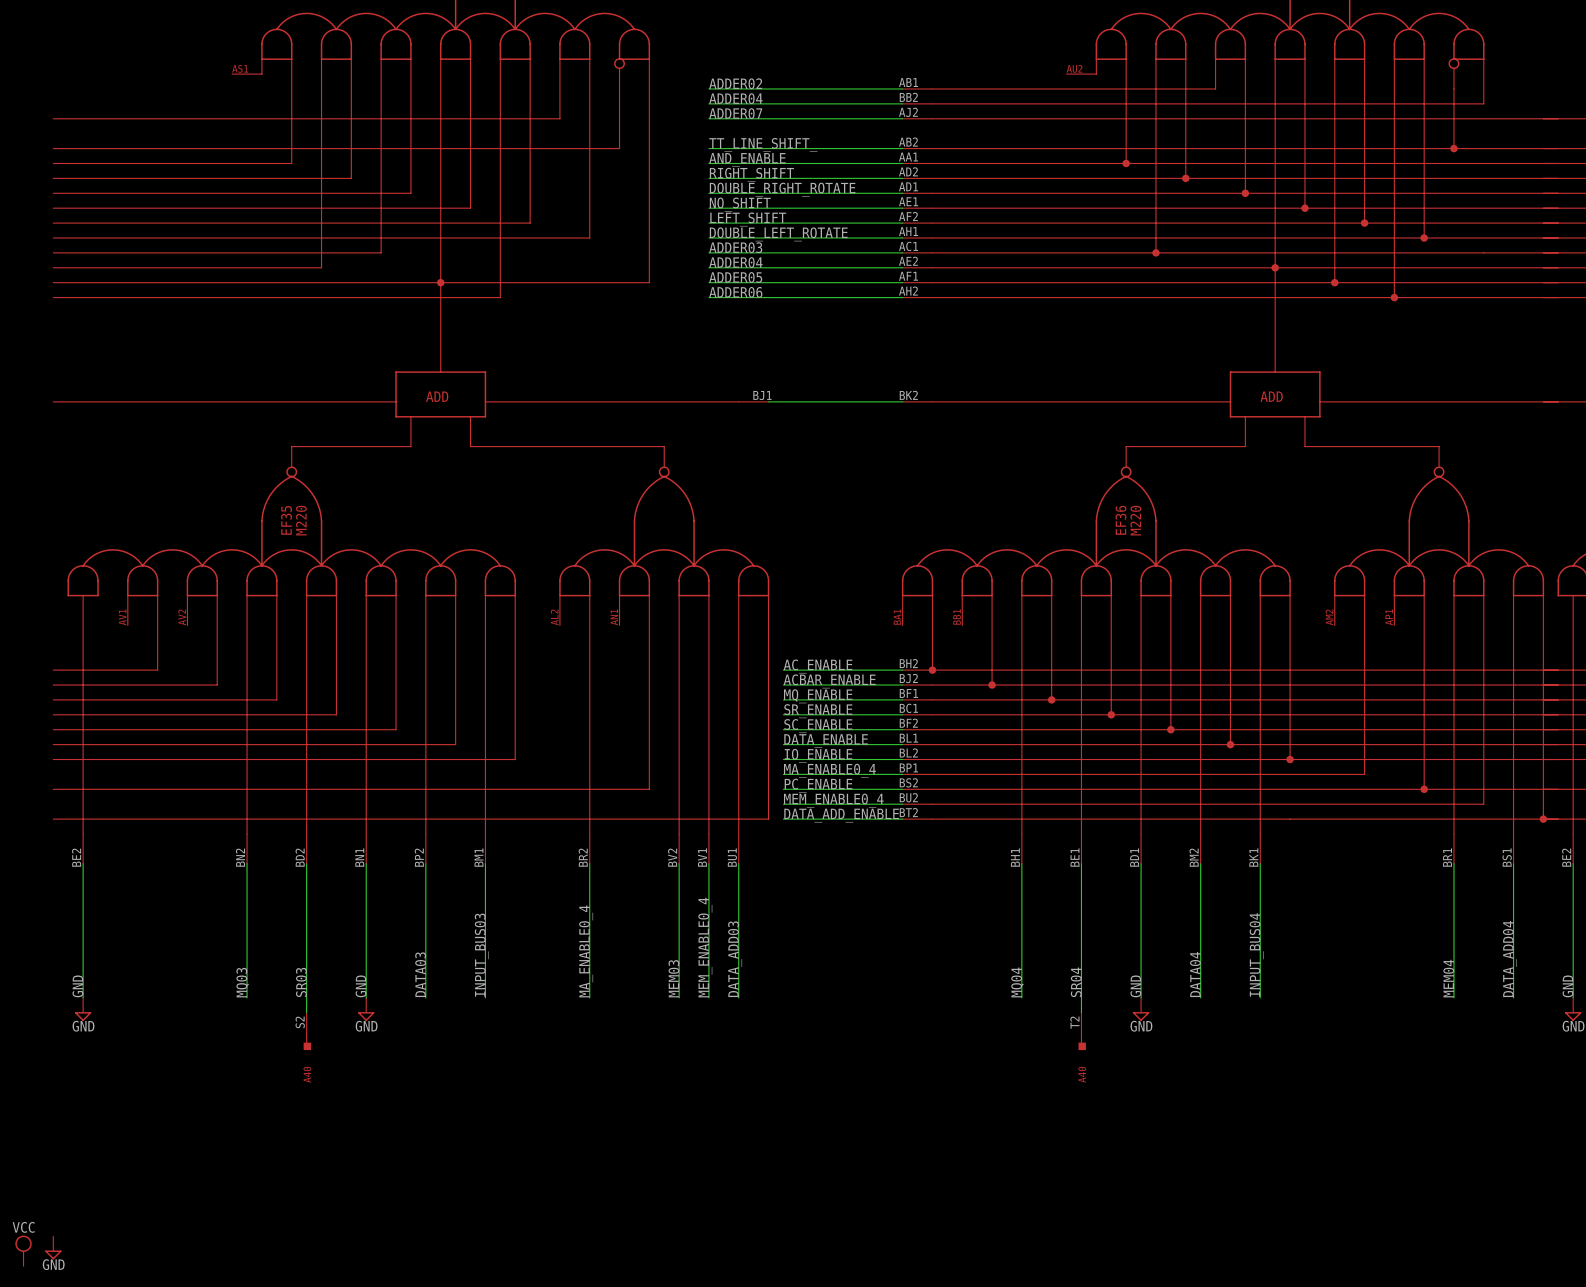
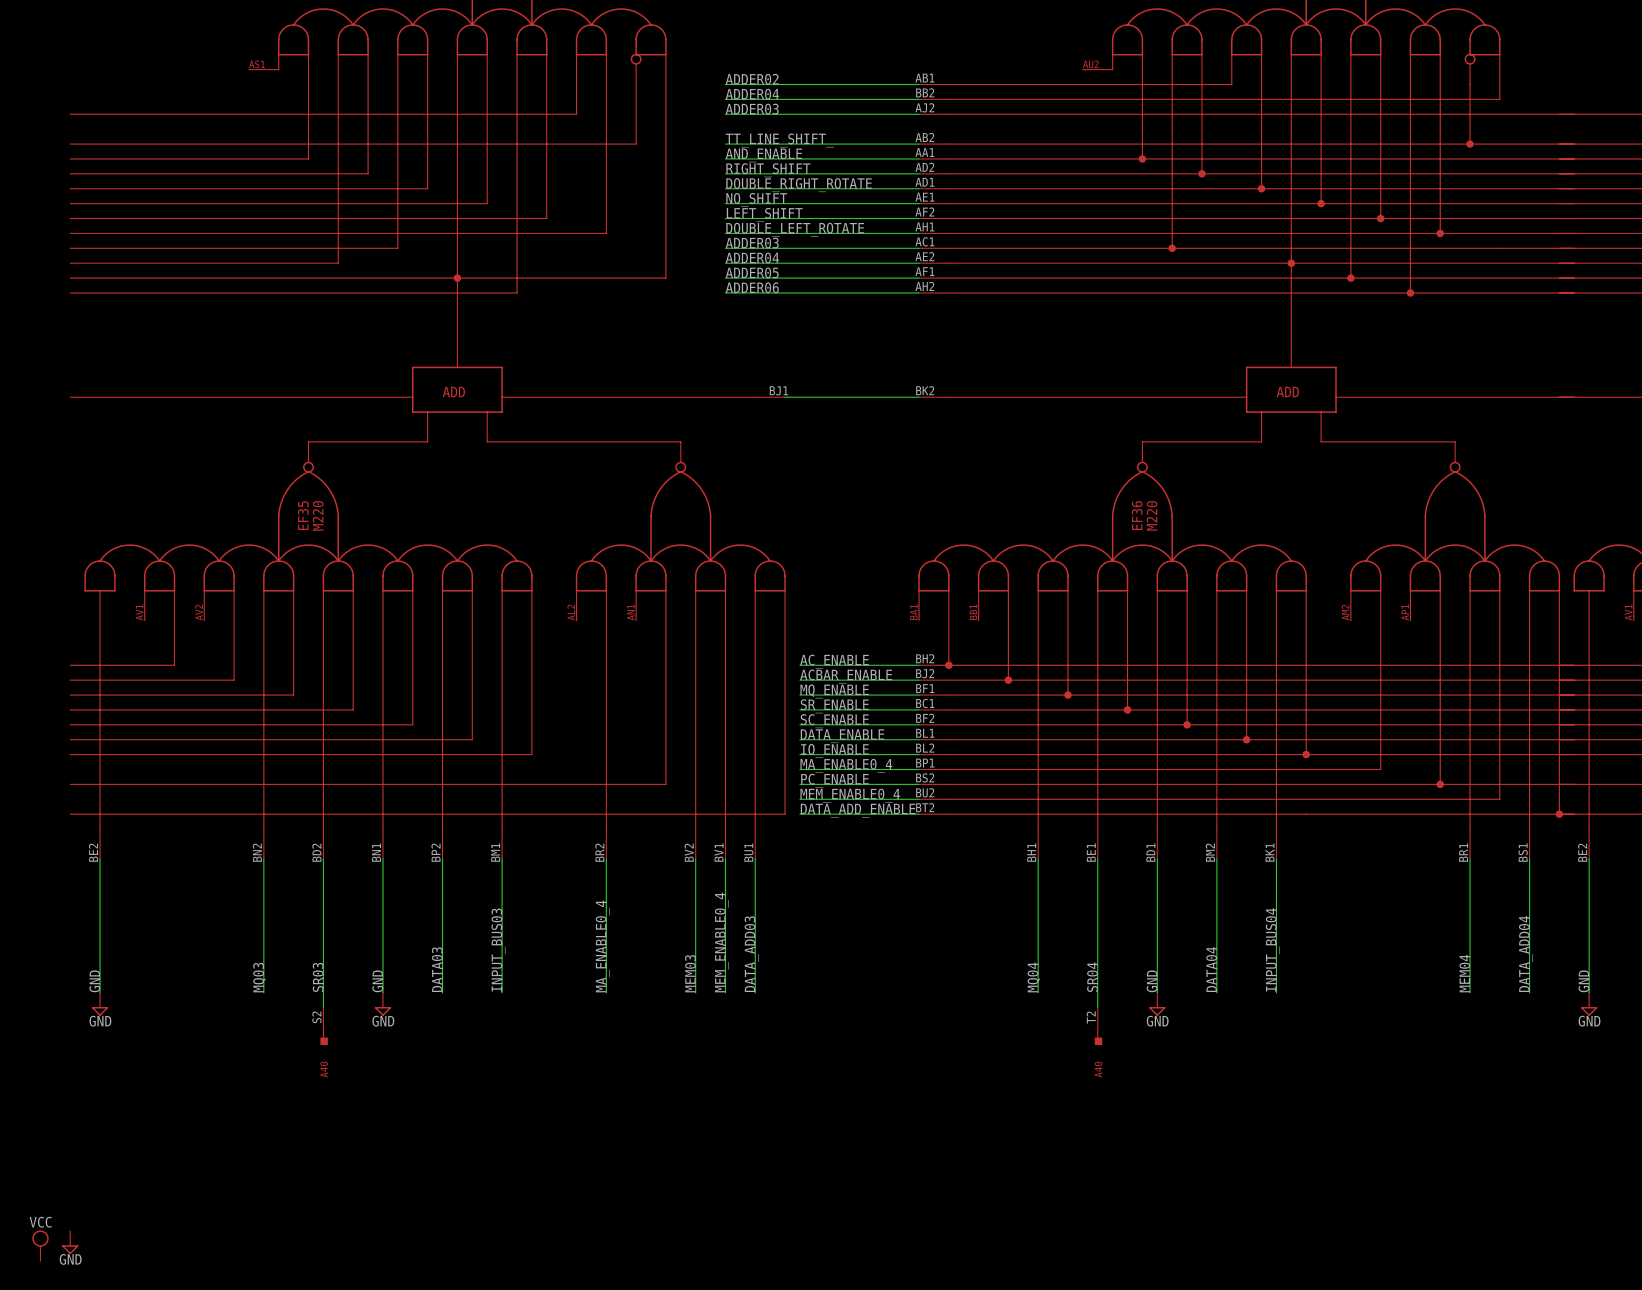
label: ADDER07 (735, 113) -> ADDER03 (752, 109)

